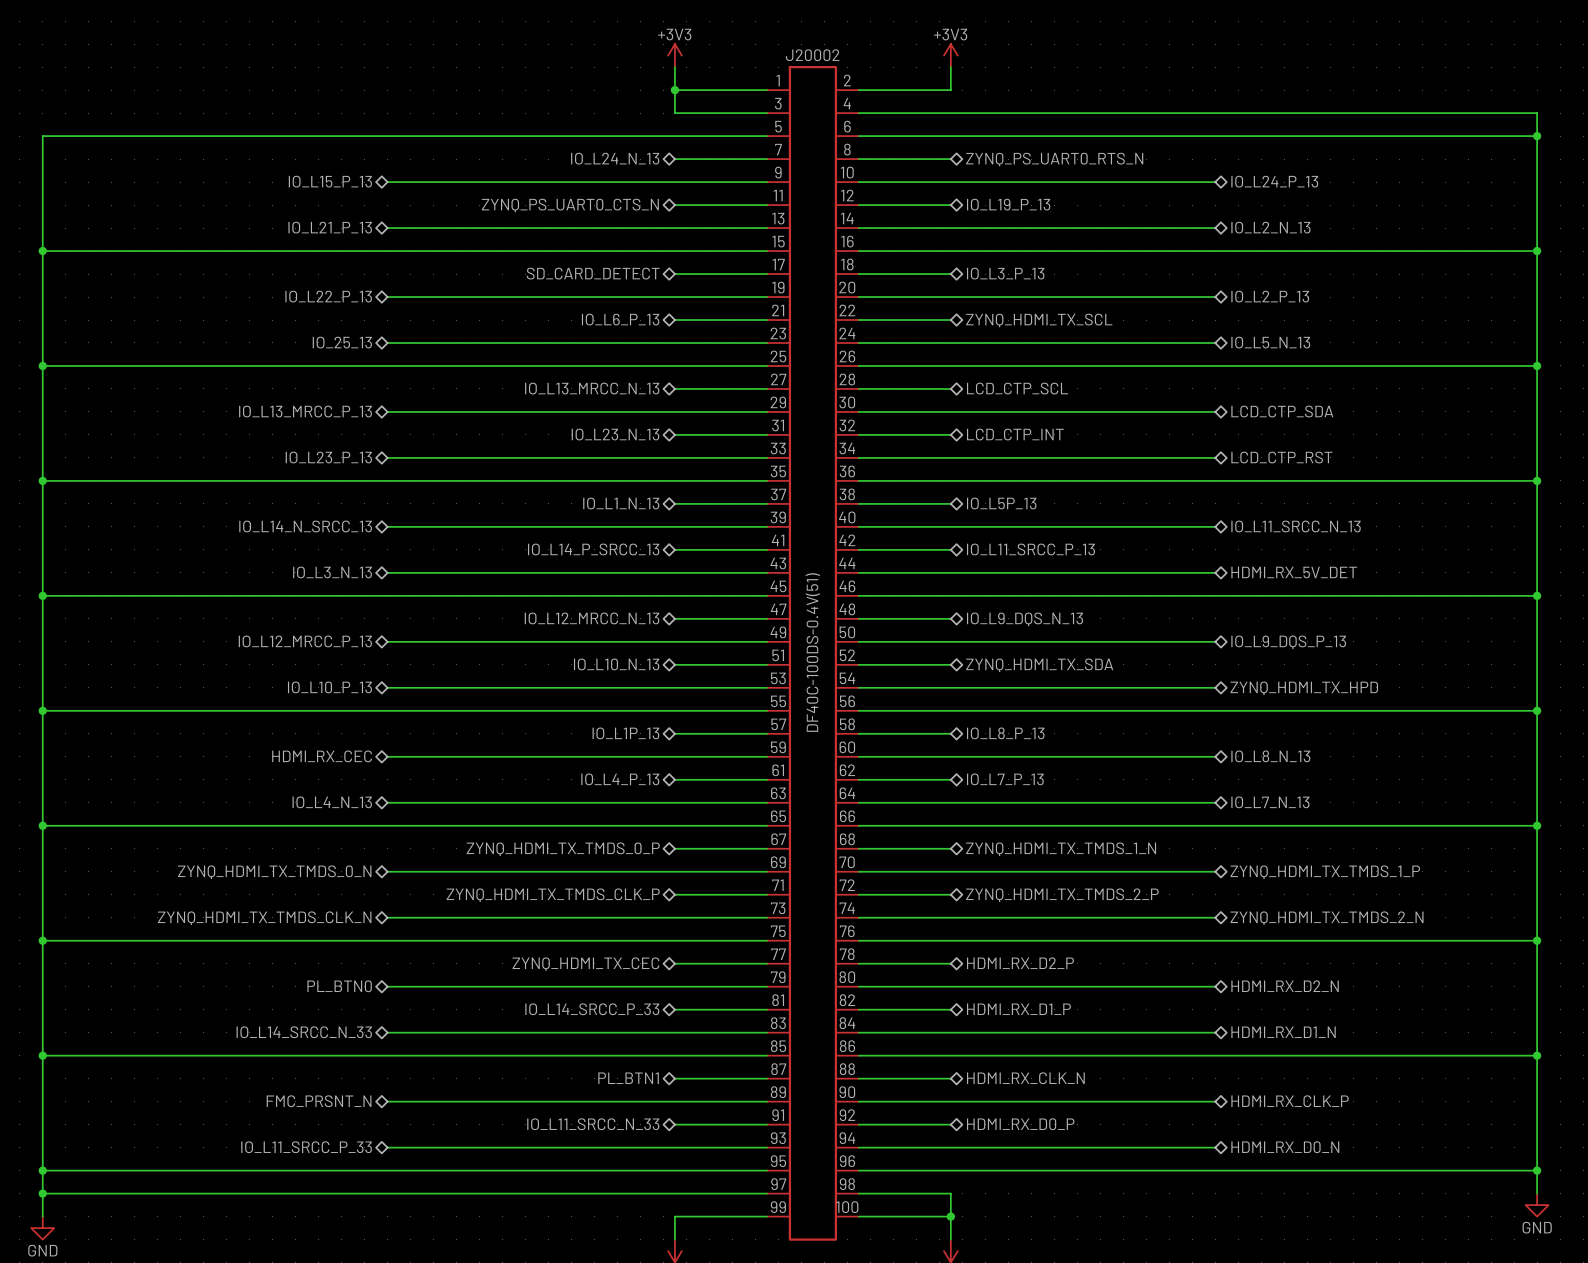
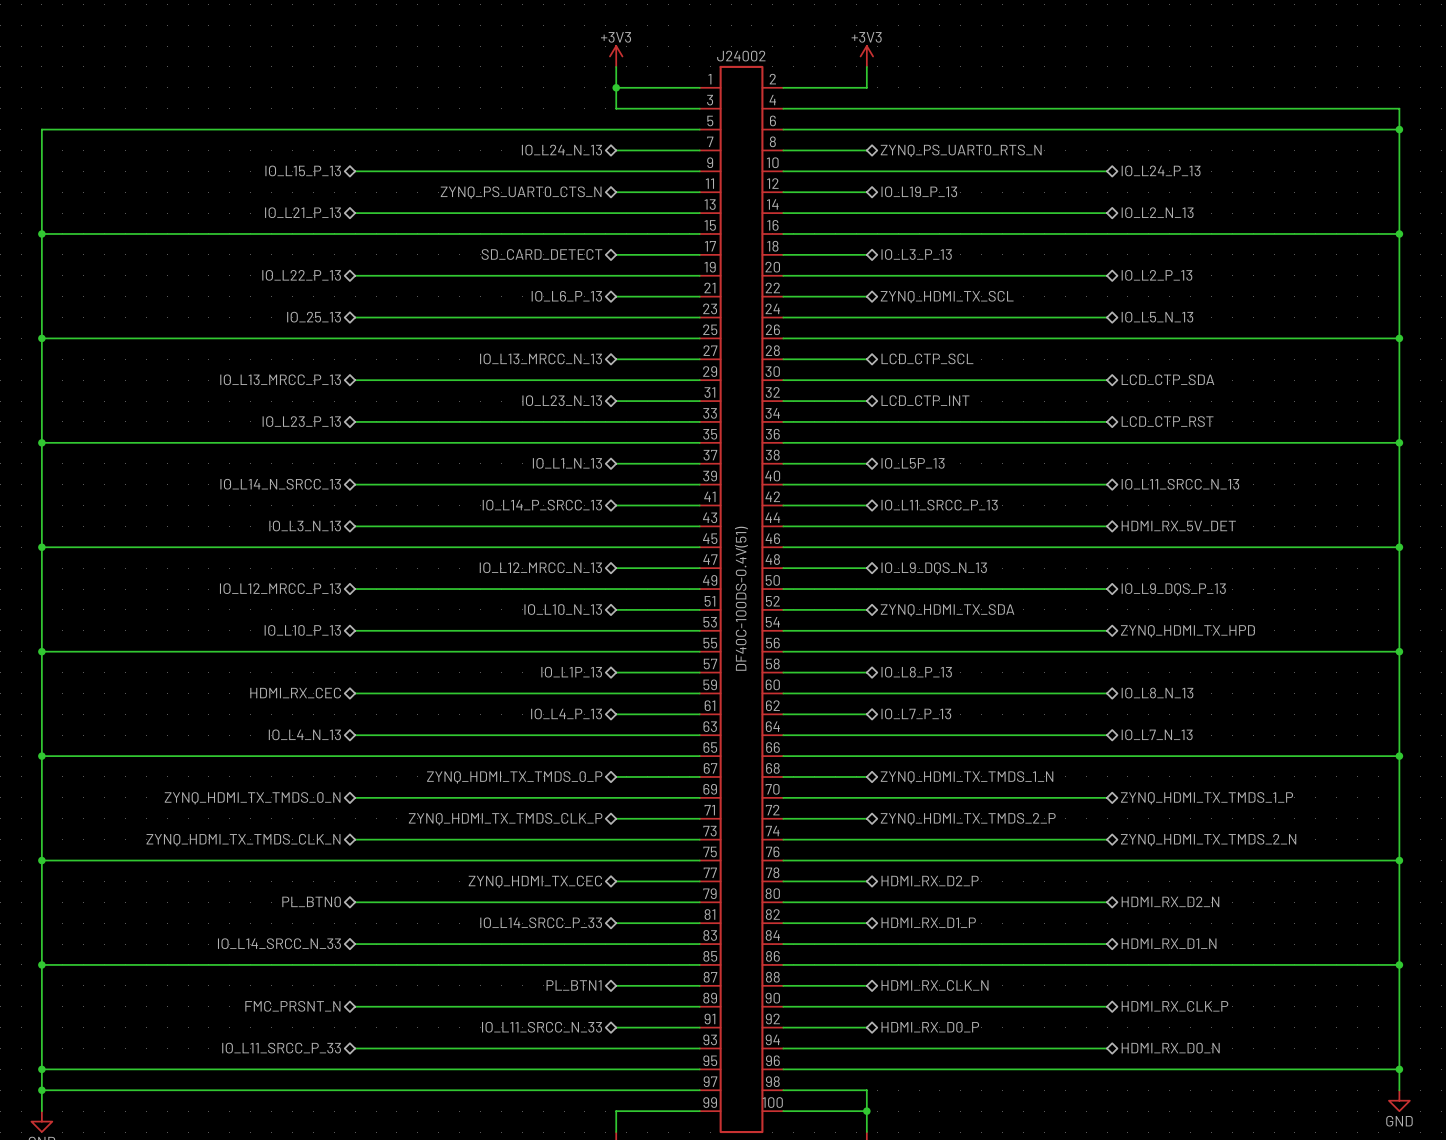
J20002 name: J20002 (812, 55) -> J24002 (741, 56)

